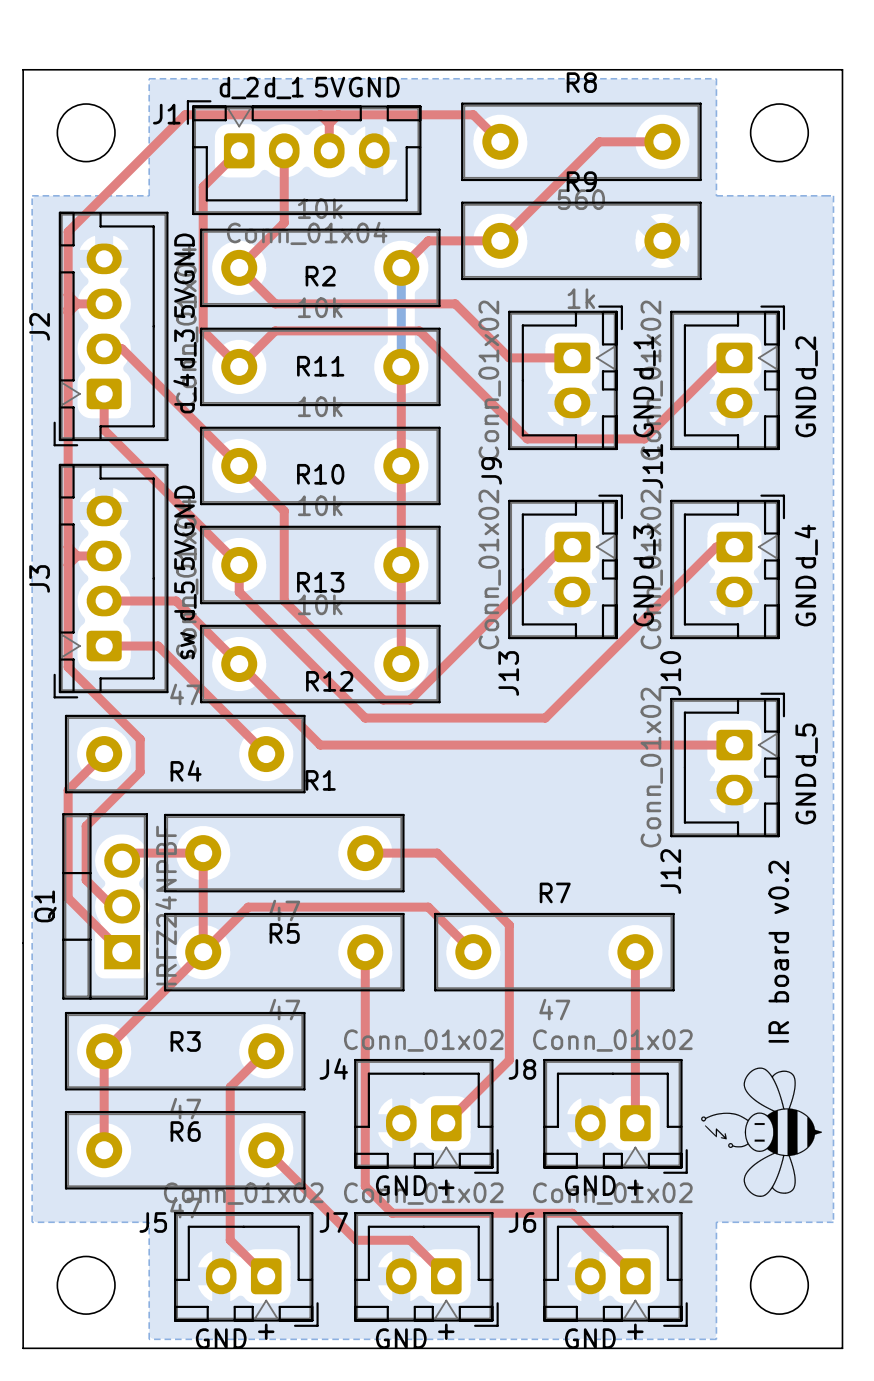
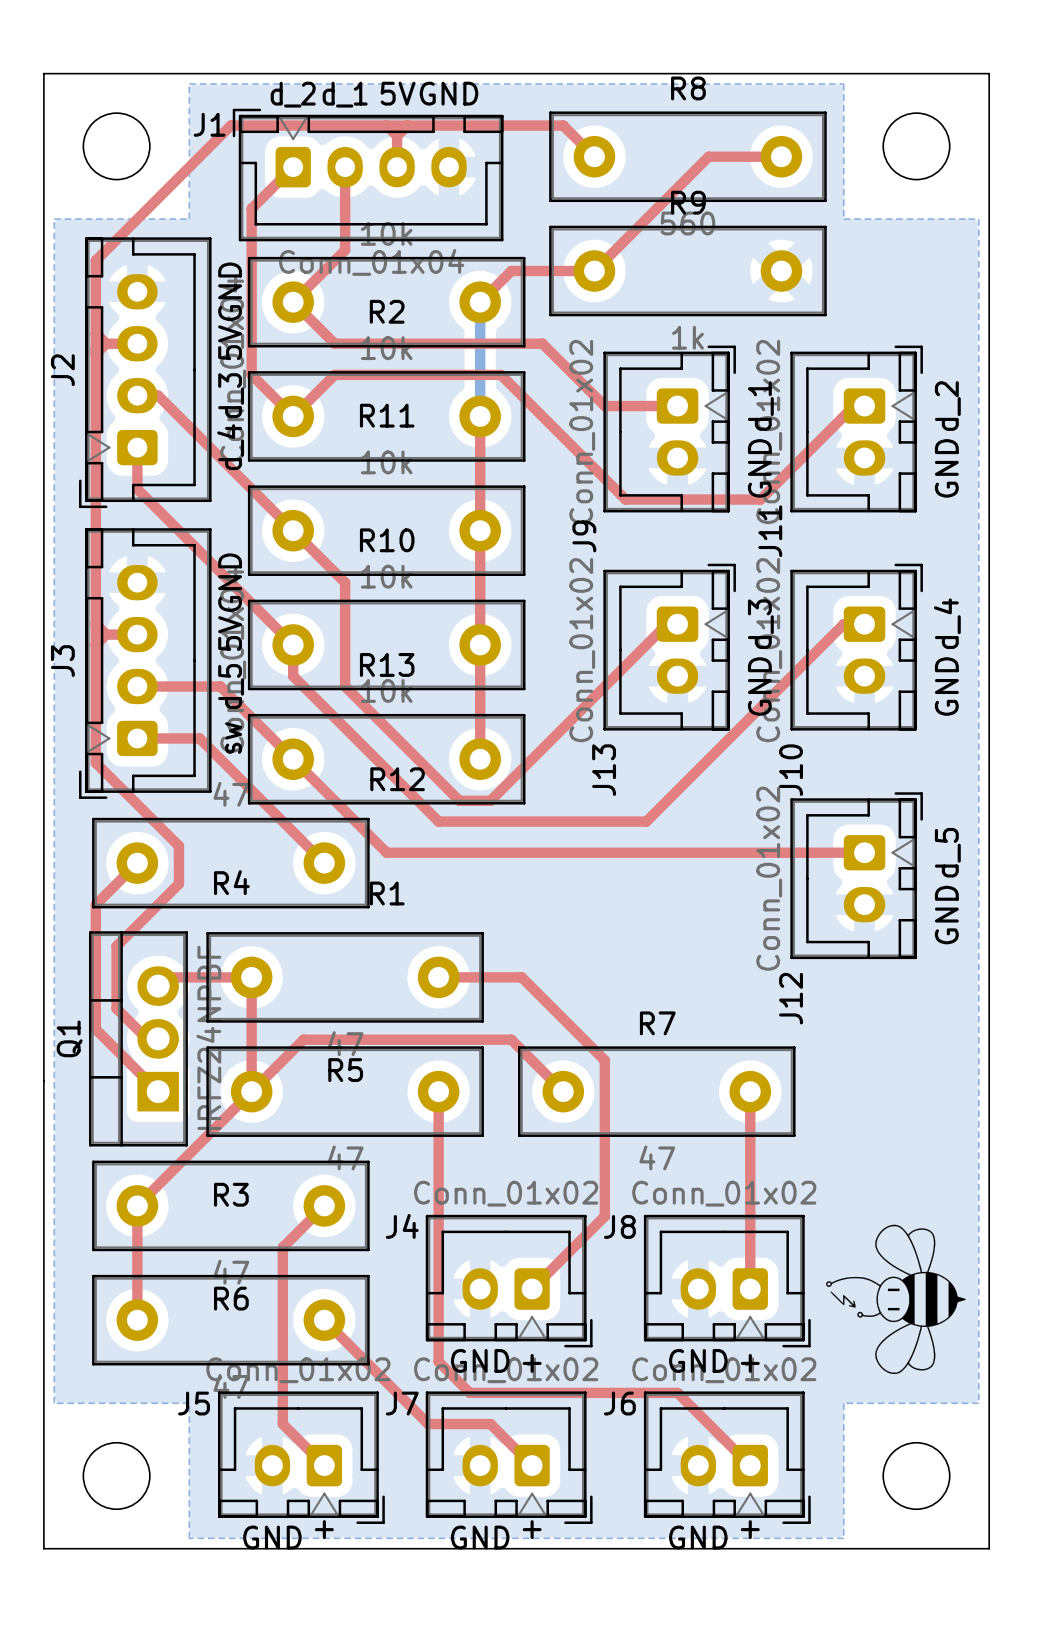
text: IR board v0.2 (778, 951) -> none

